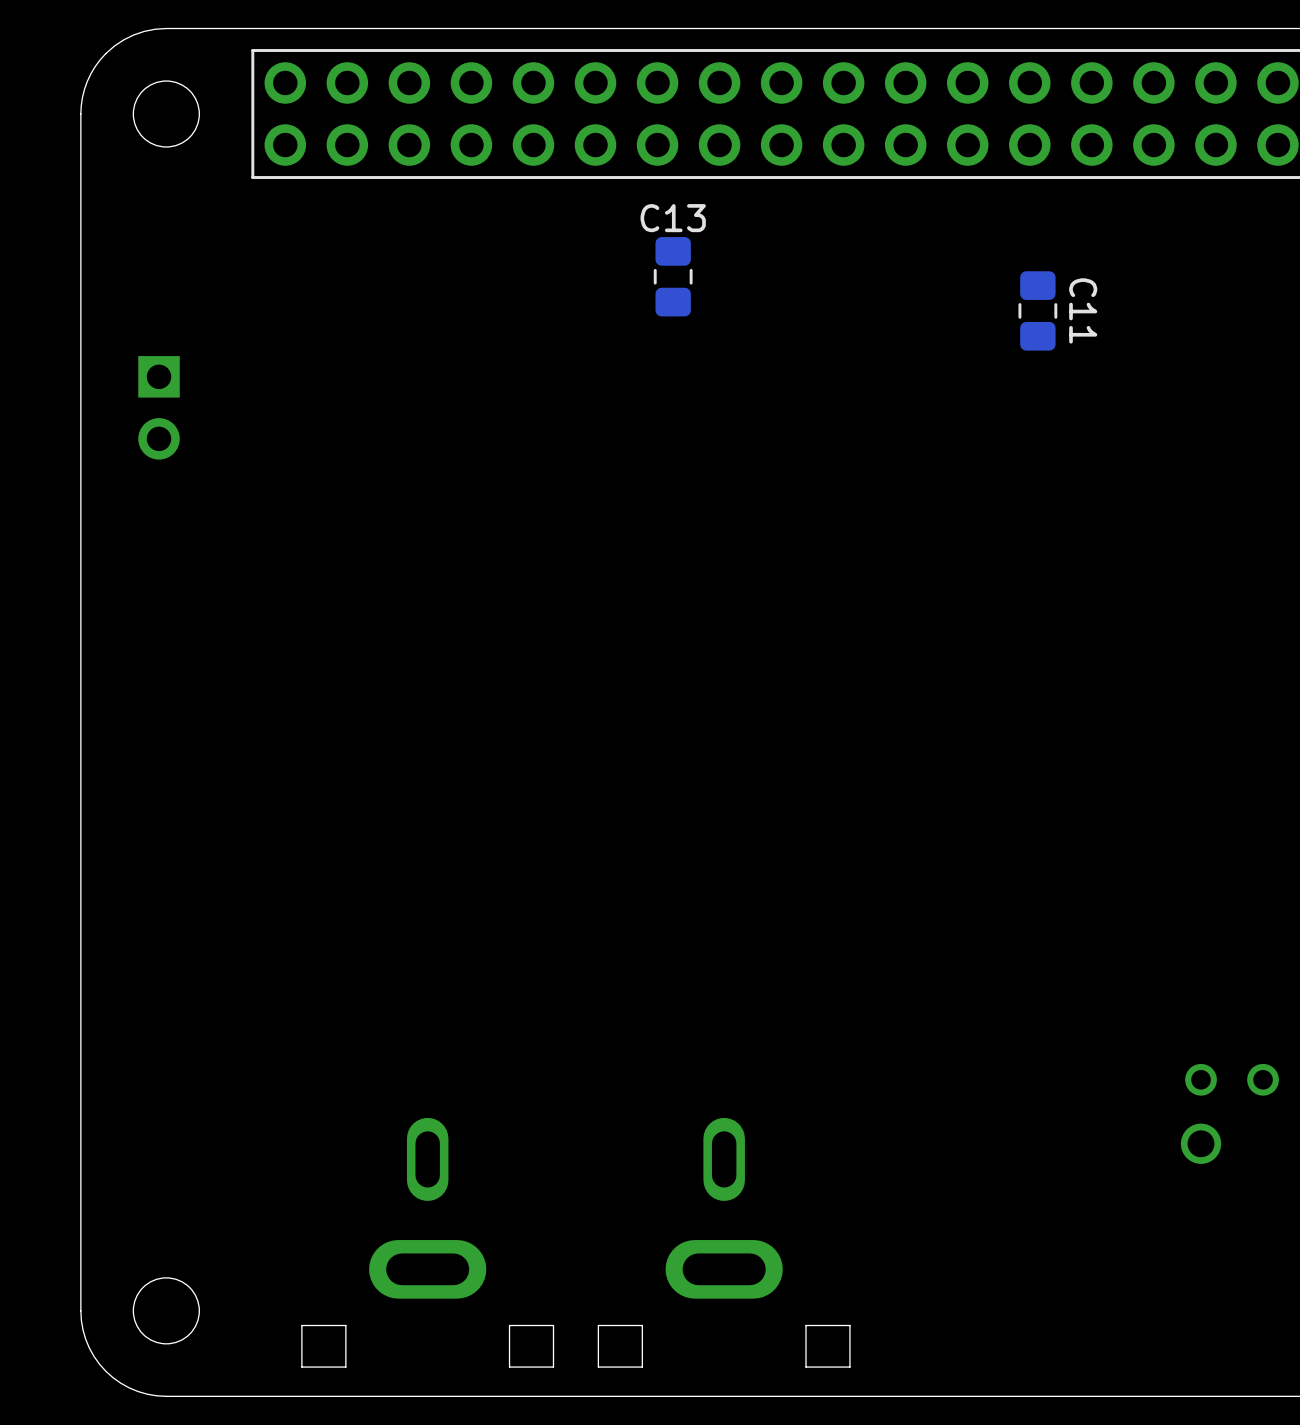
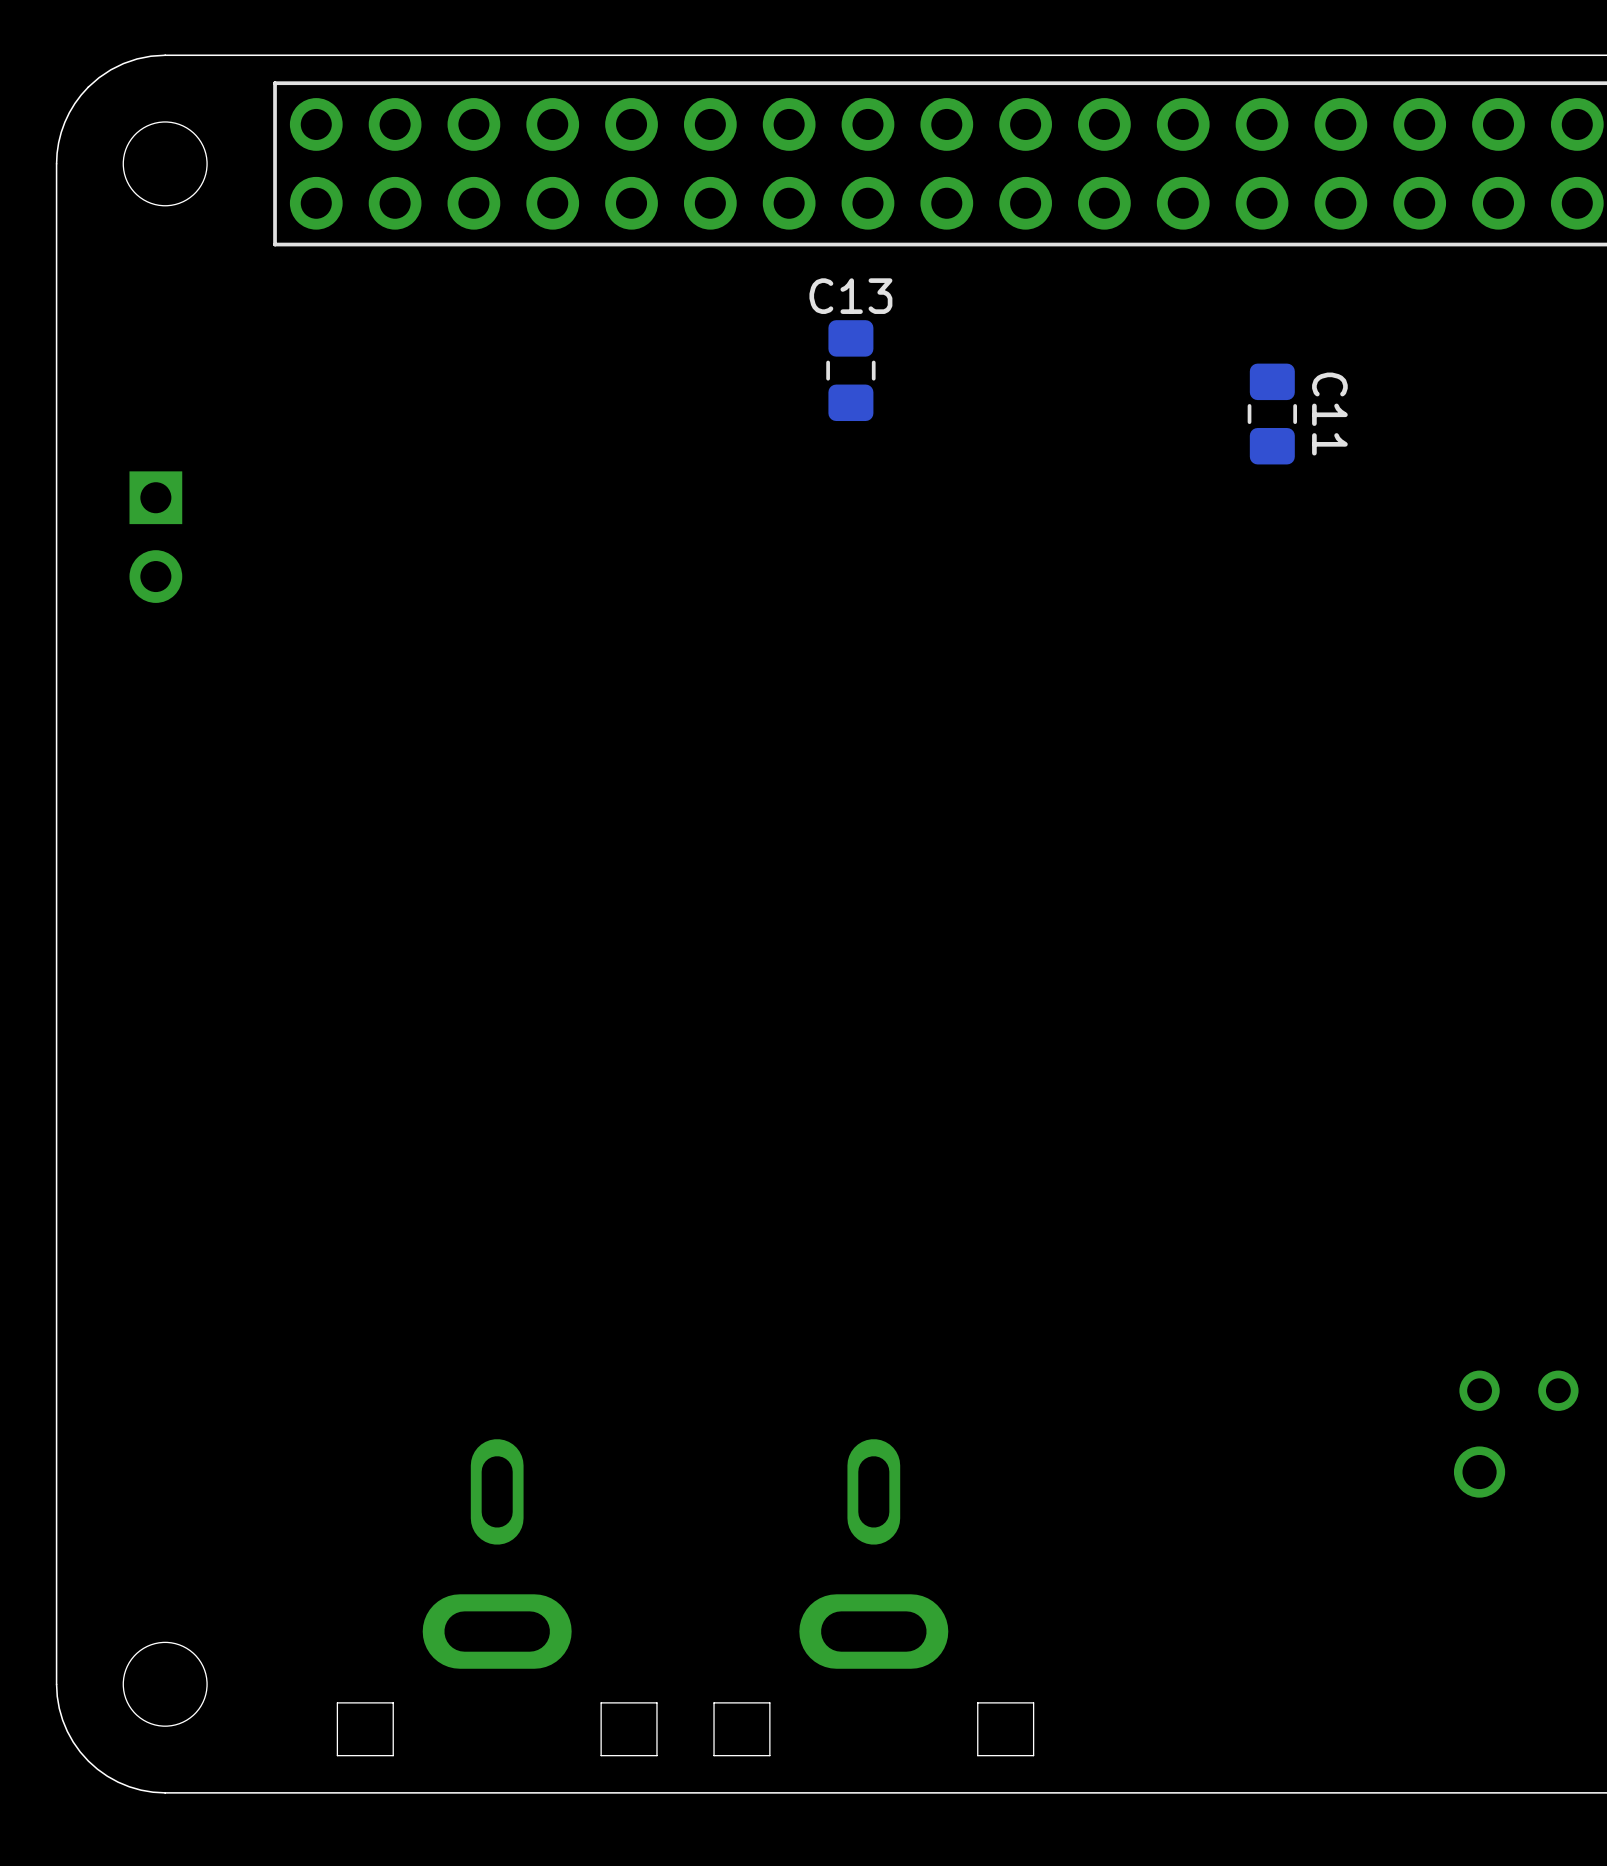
C13 position: (673, 276) -> (850, 370)

